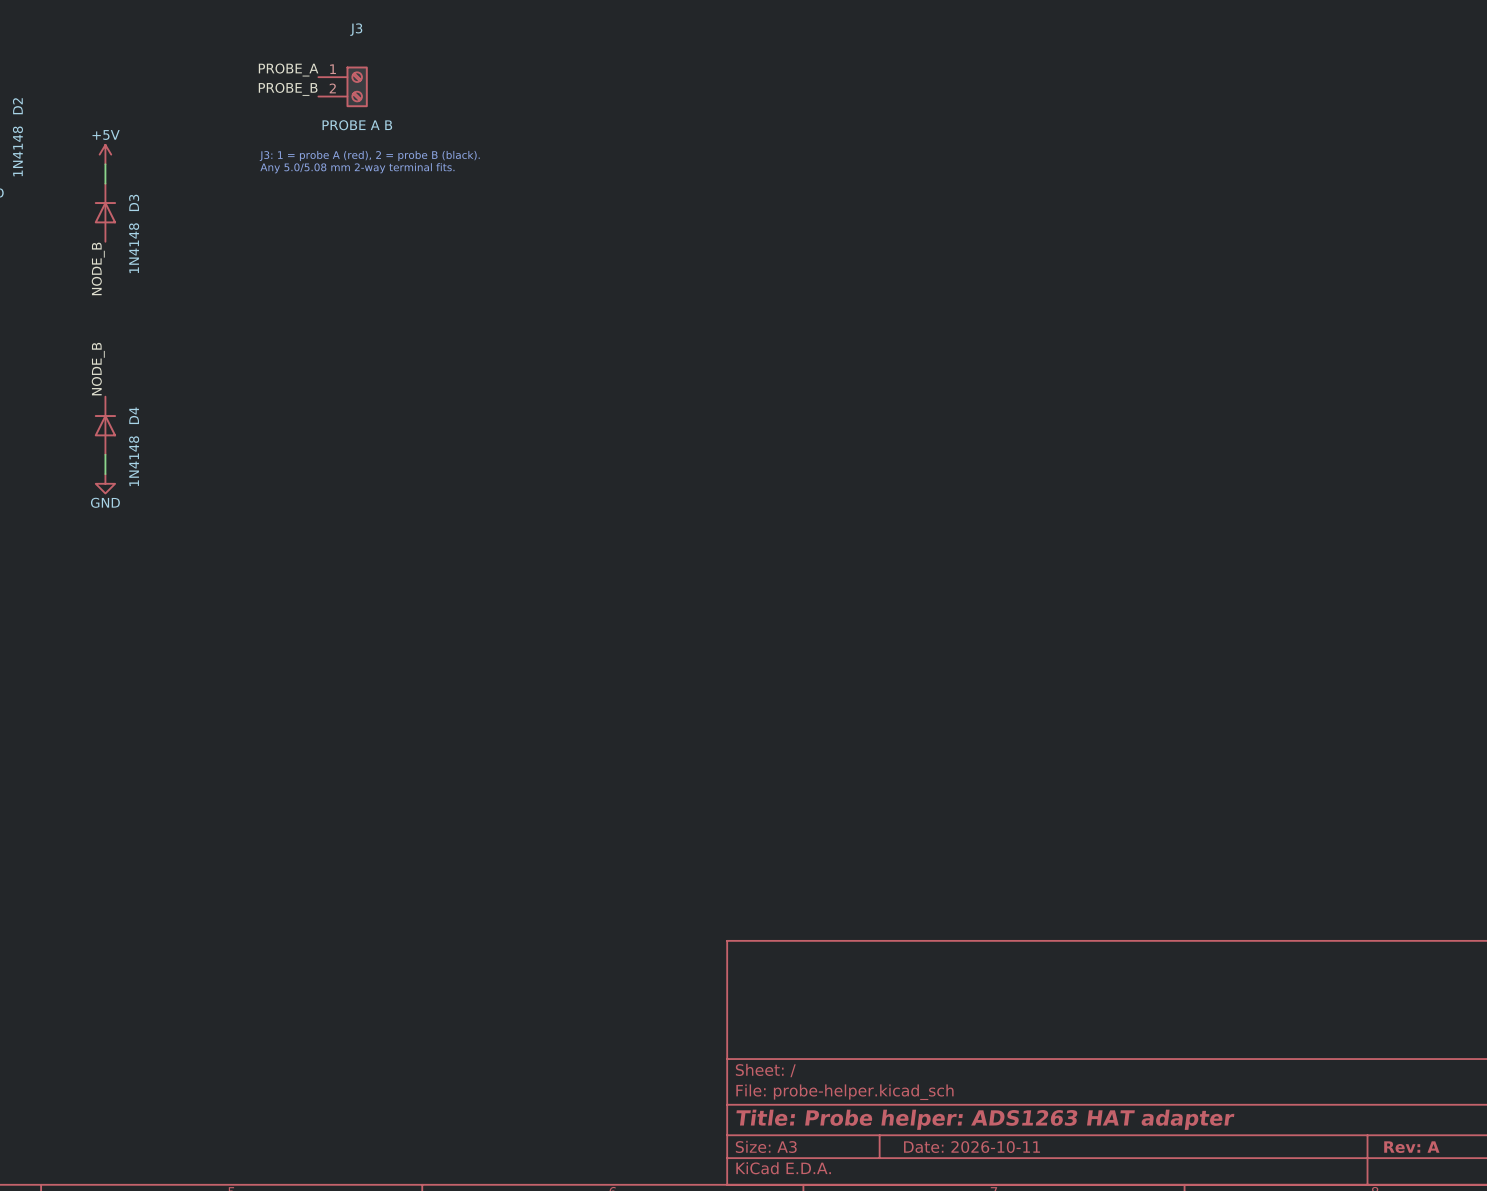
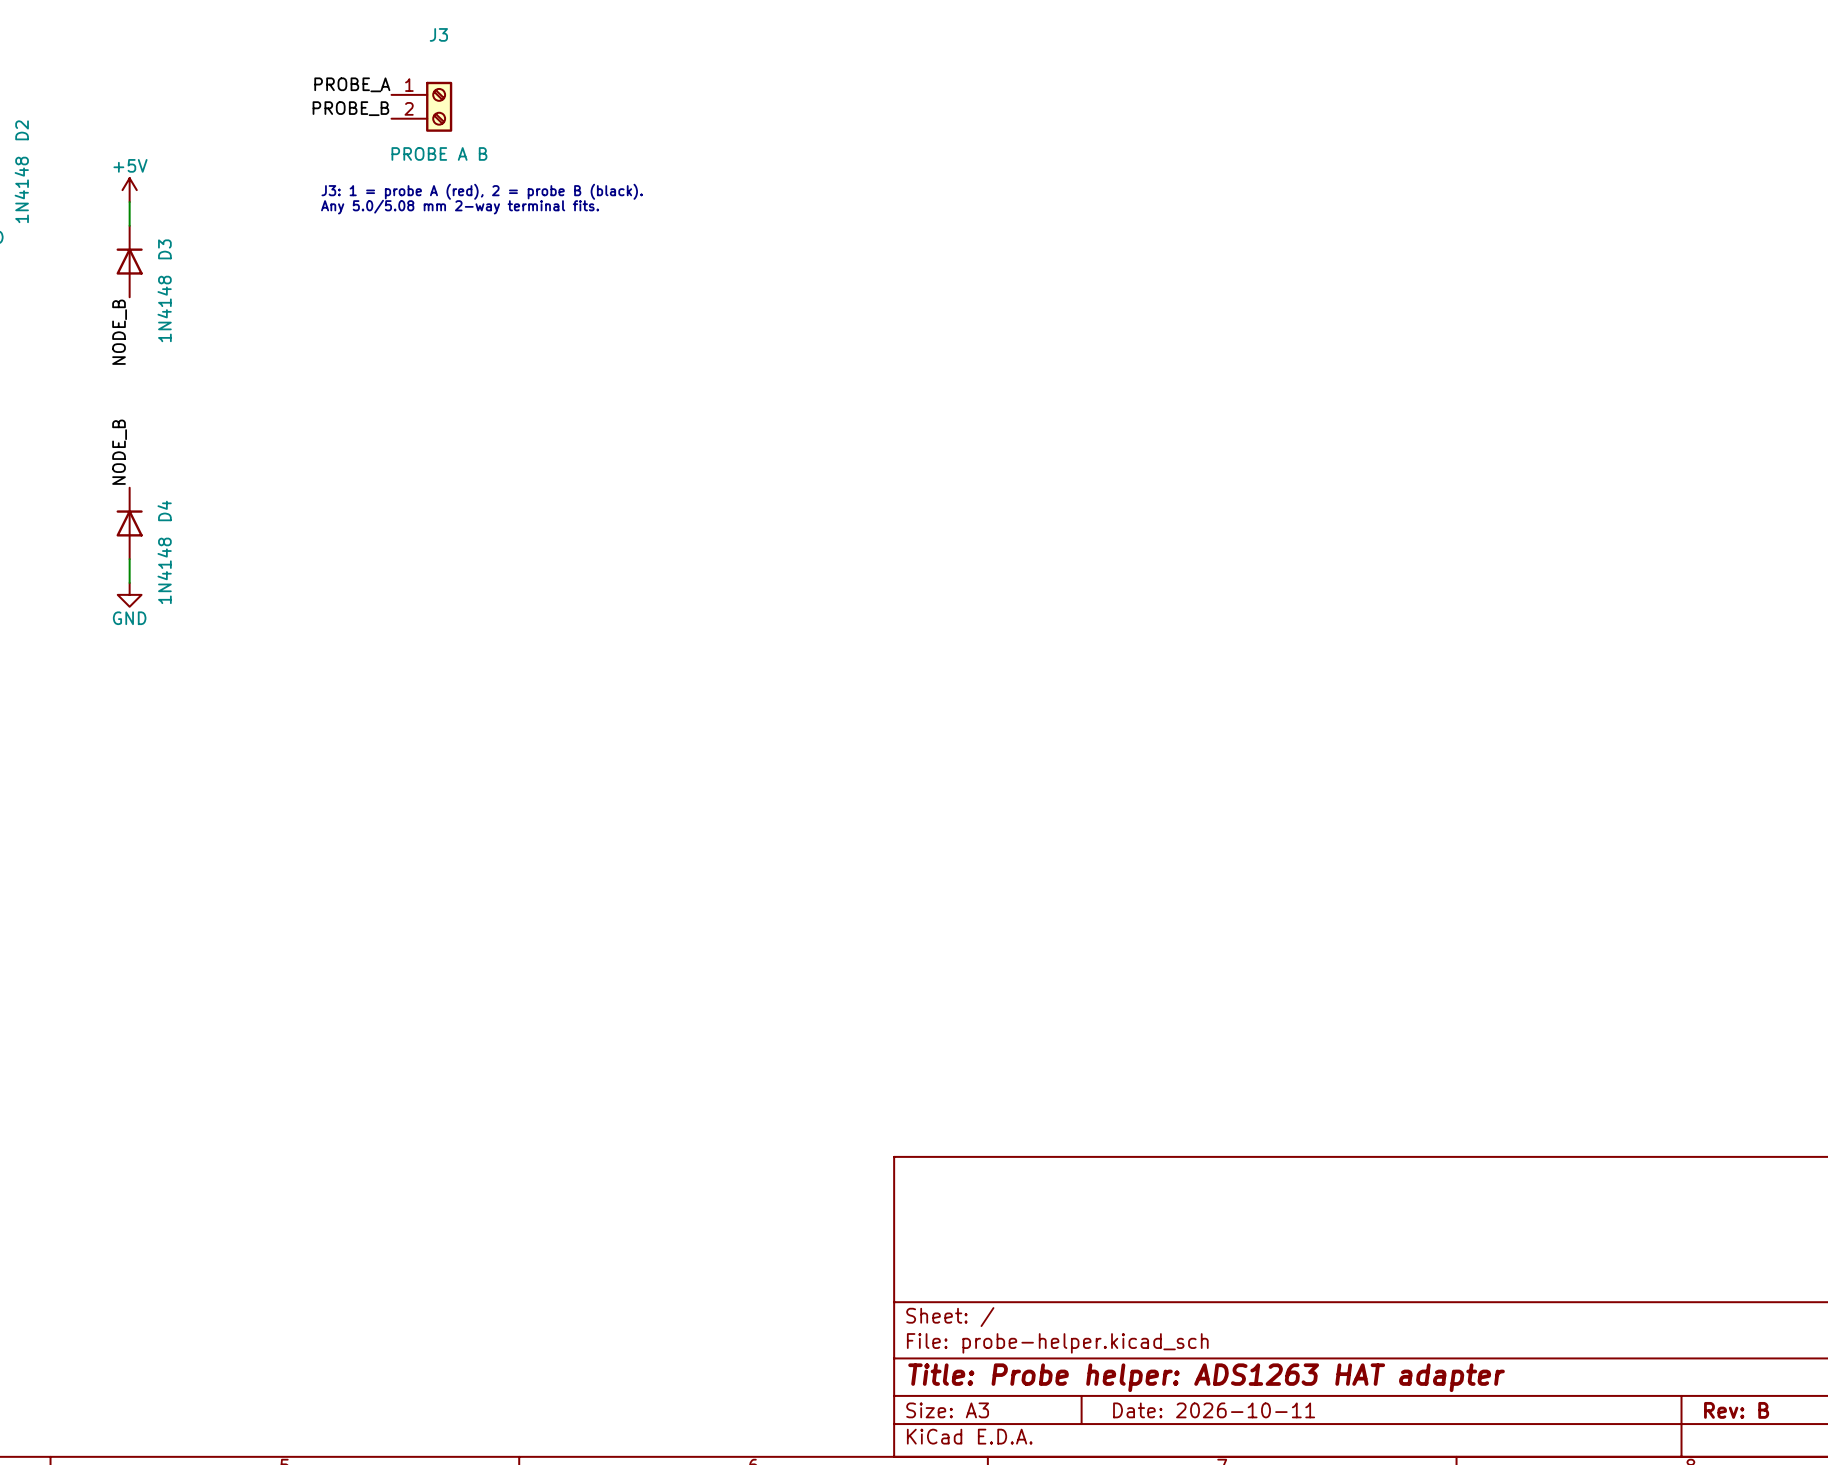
title block: Rev: A (1411, 1147) -> Rev: B (1736, 1410)

